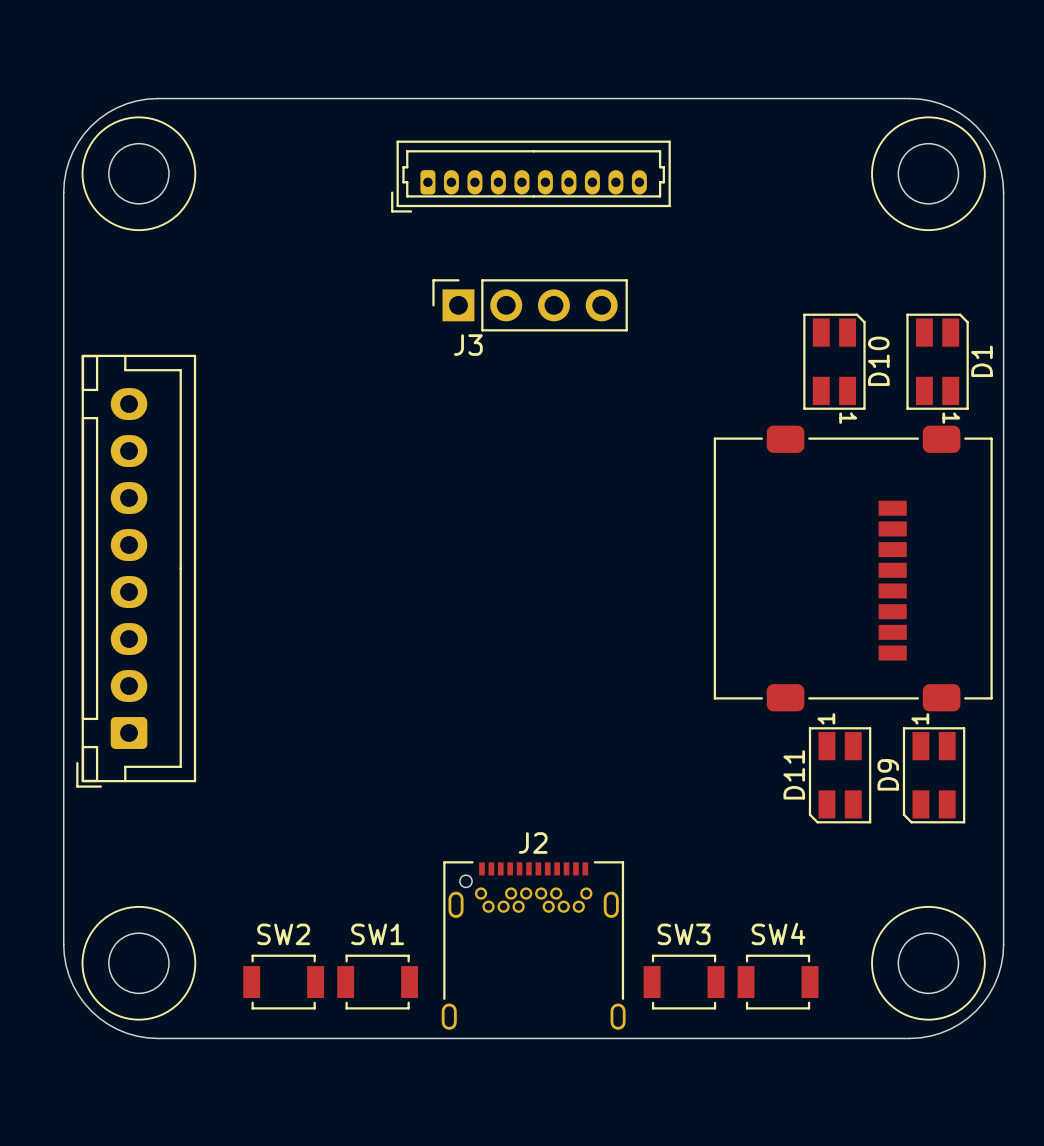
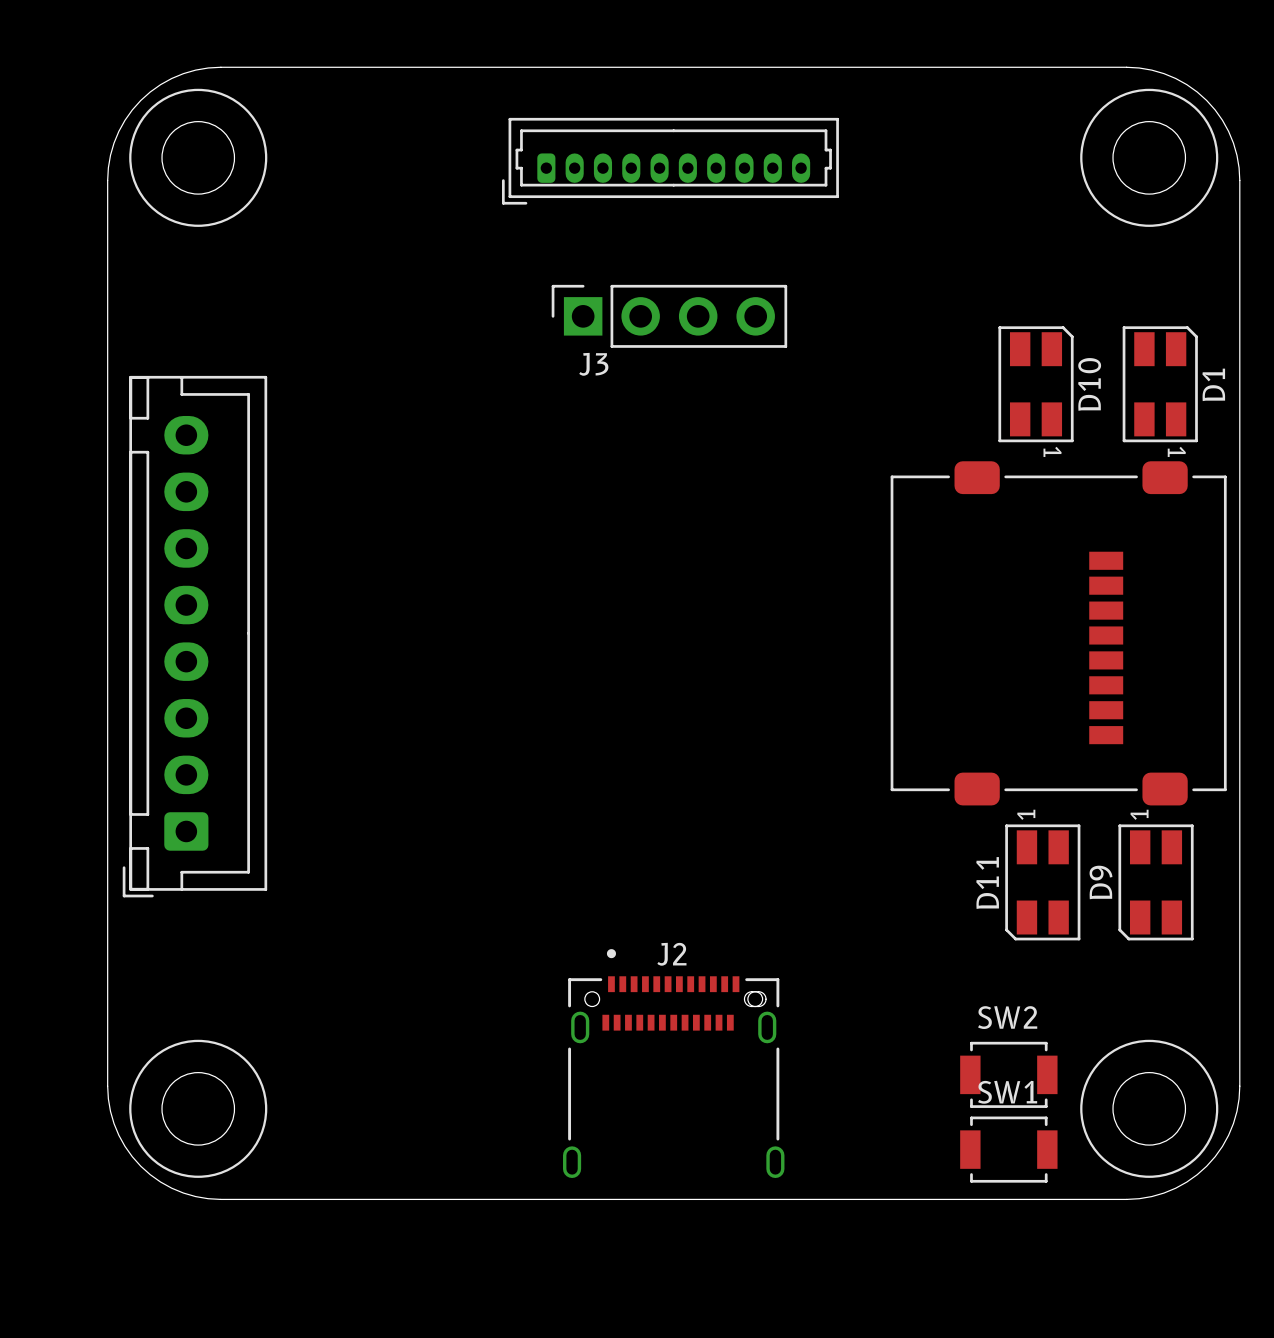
J2 footprint: [441, 861, 626, 1030] -> [563, 949, 785, 1179]
SW2 position: (283, 982) -> (1008, 1074)
SW1 position: (377, 982) -> (1008, 1149)
SW3: (684, 982) -> none
SW4: (778, 982) -> none

